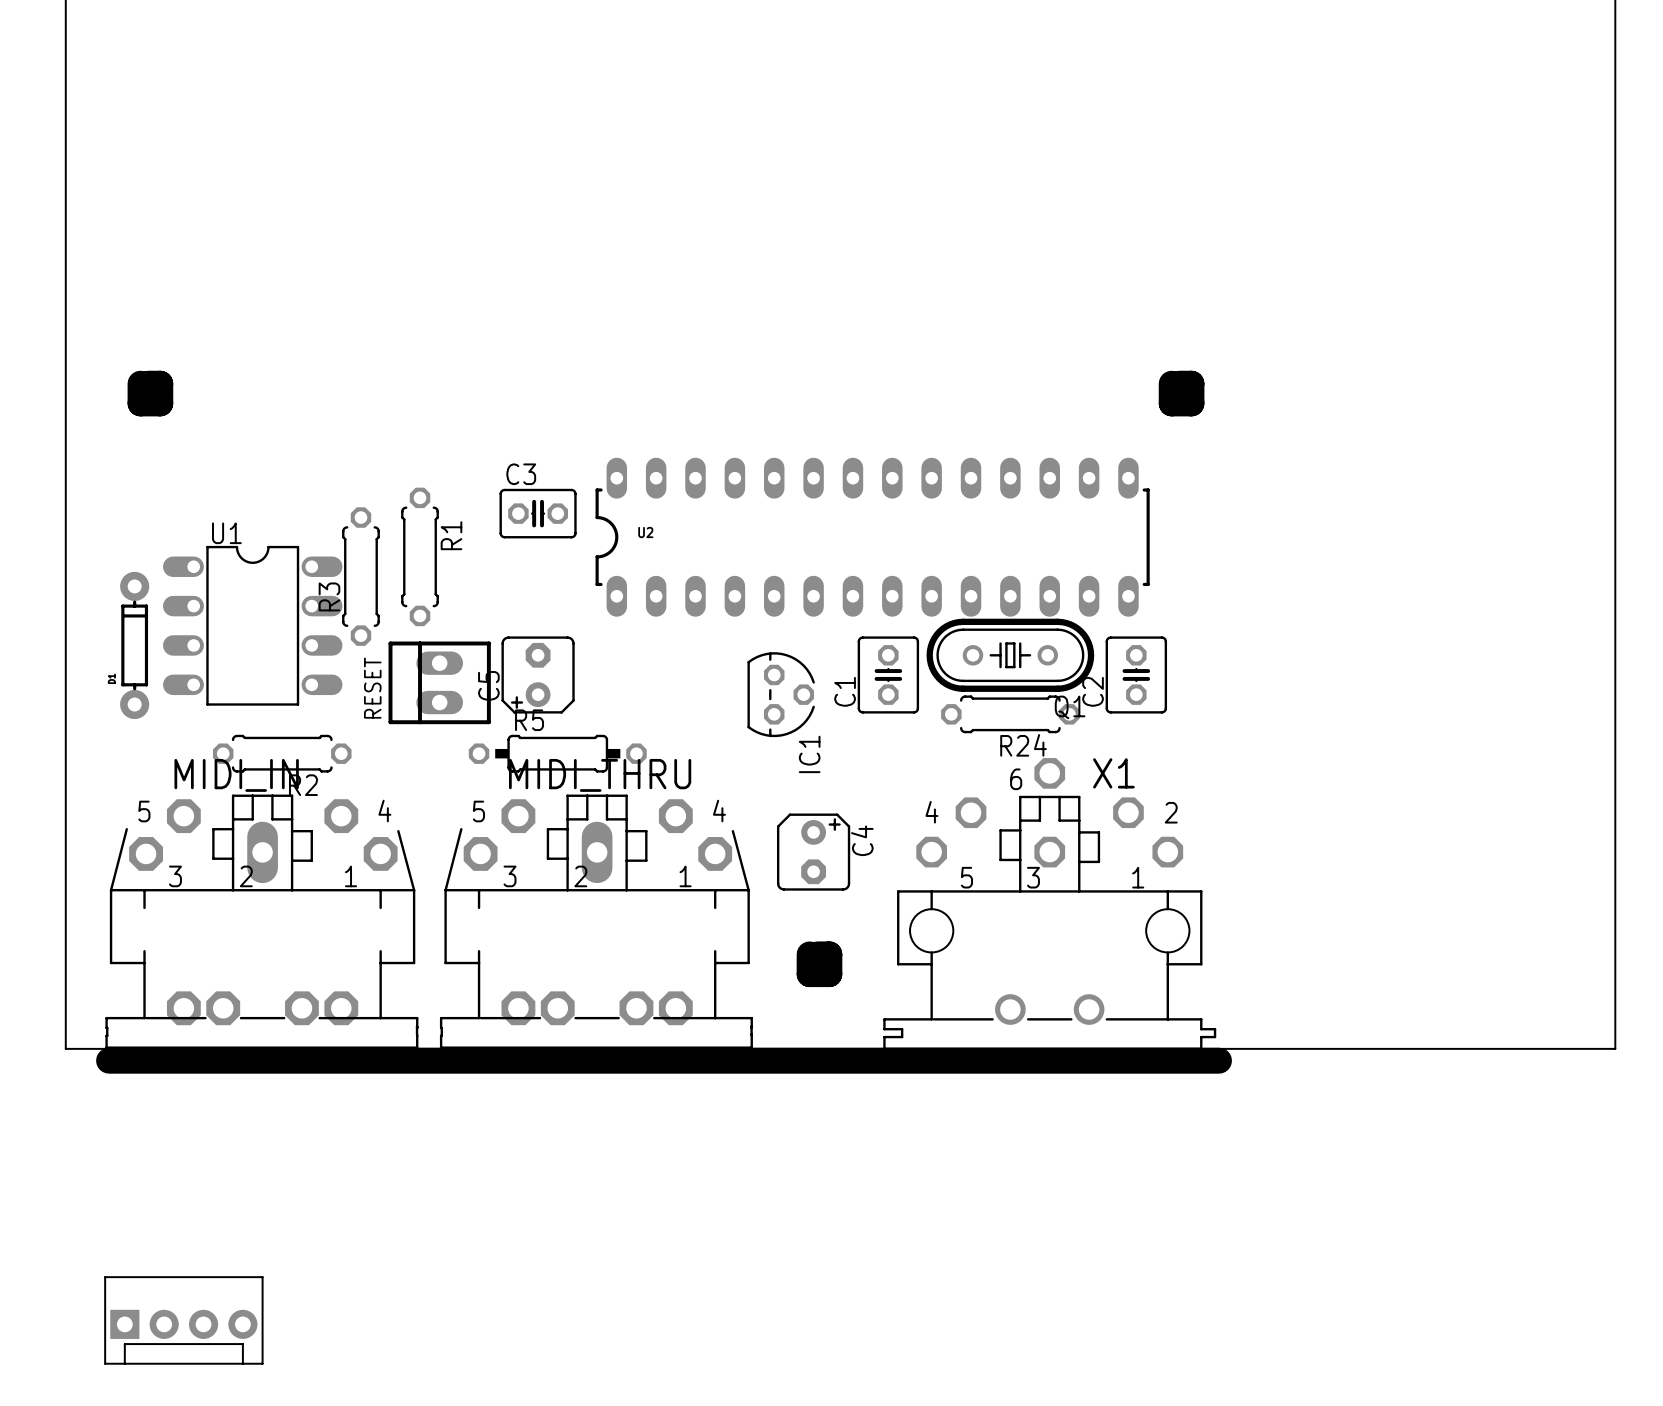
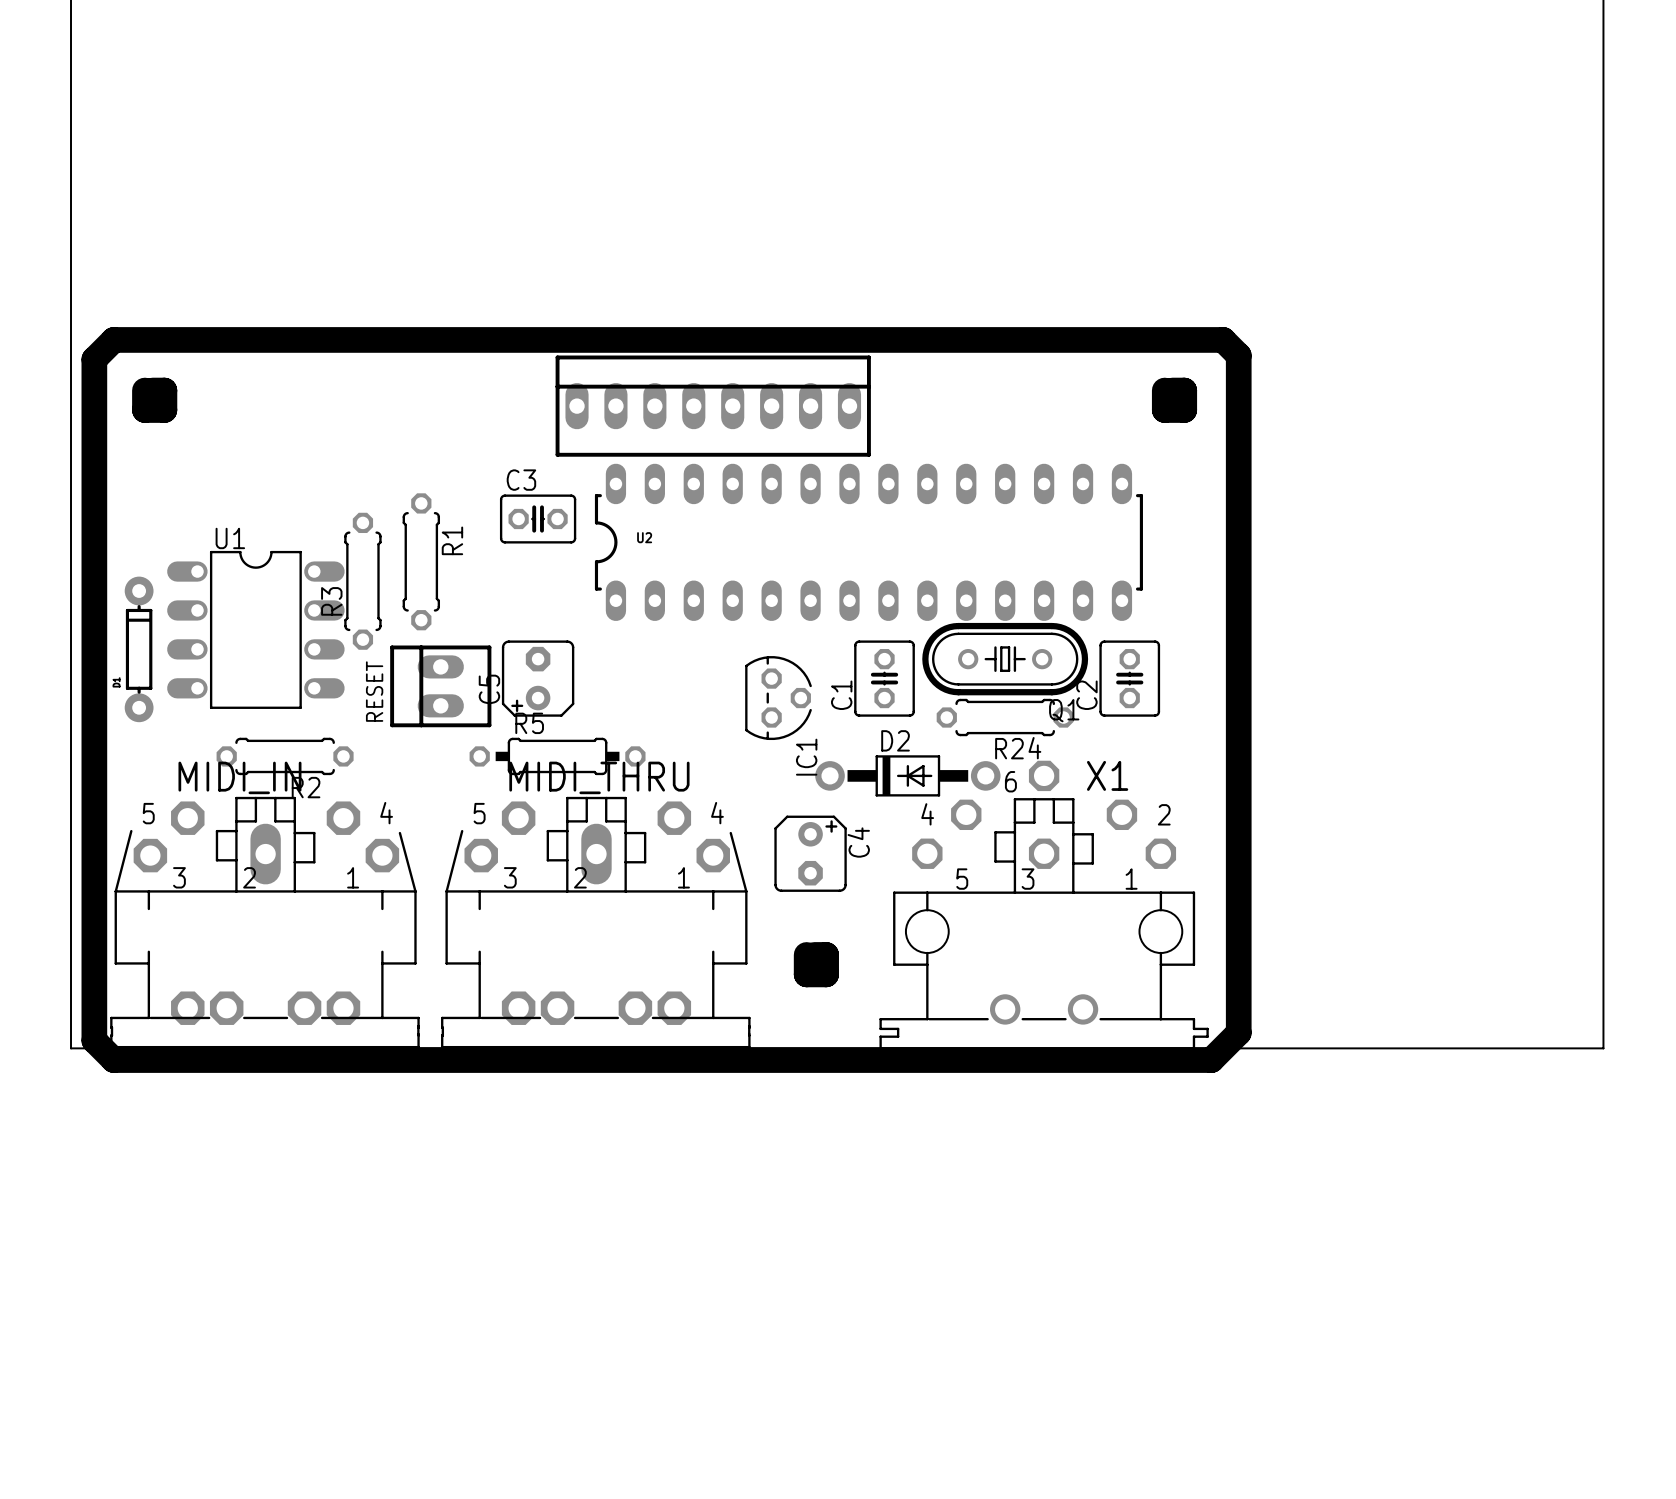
part: none -> (713, 406)
D2: none -> (907, 775)
board edge: none -> (113, 1060) (94, 1040) (94, 359) (113, 339) (1223, 339) (1238, 355) (1238, 1032) (1211, 1060)
part: (183, 1320) -> none

